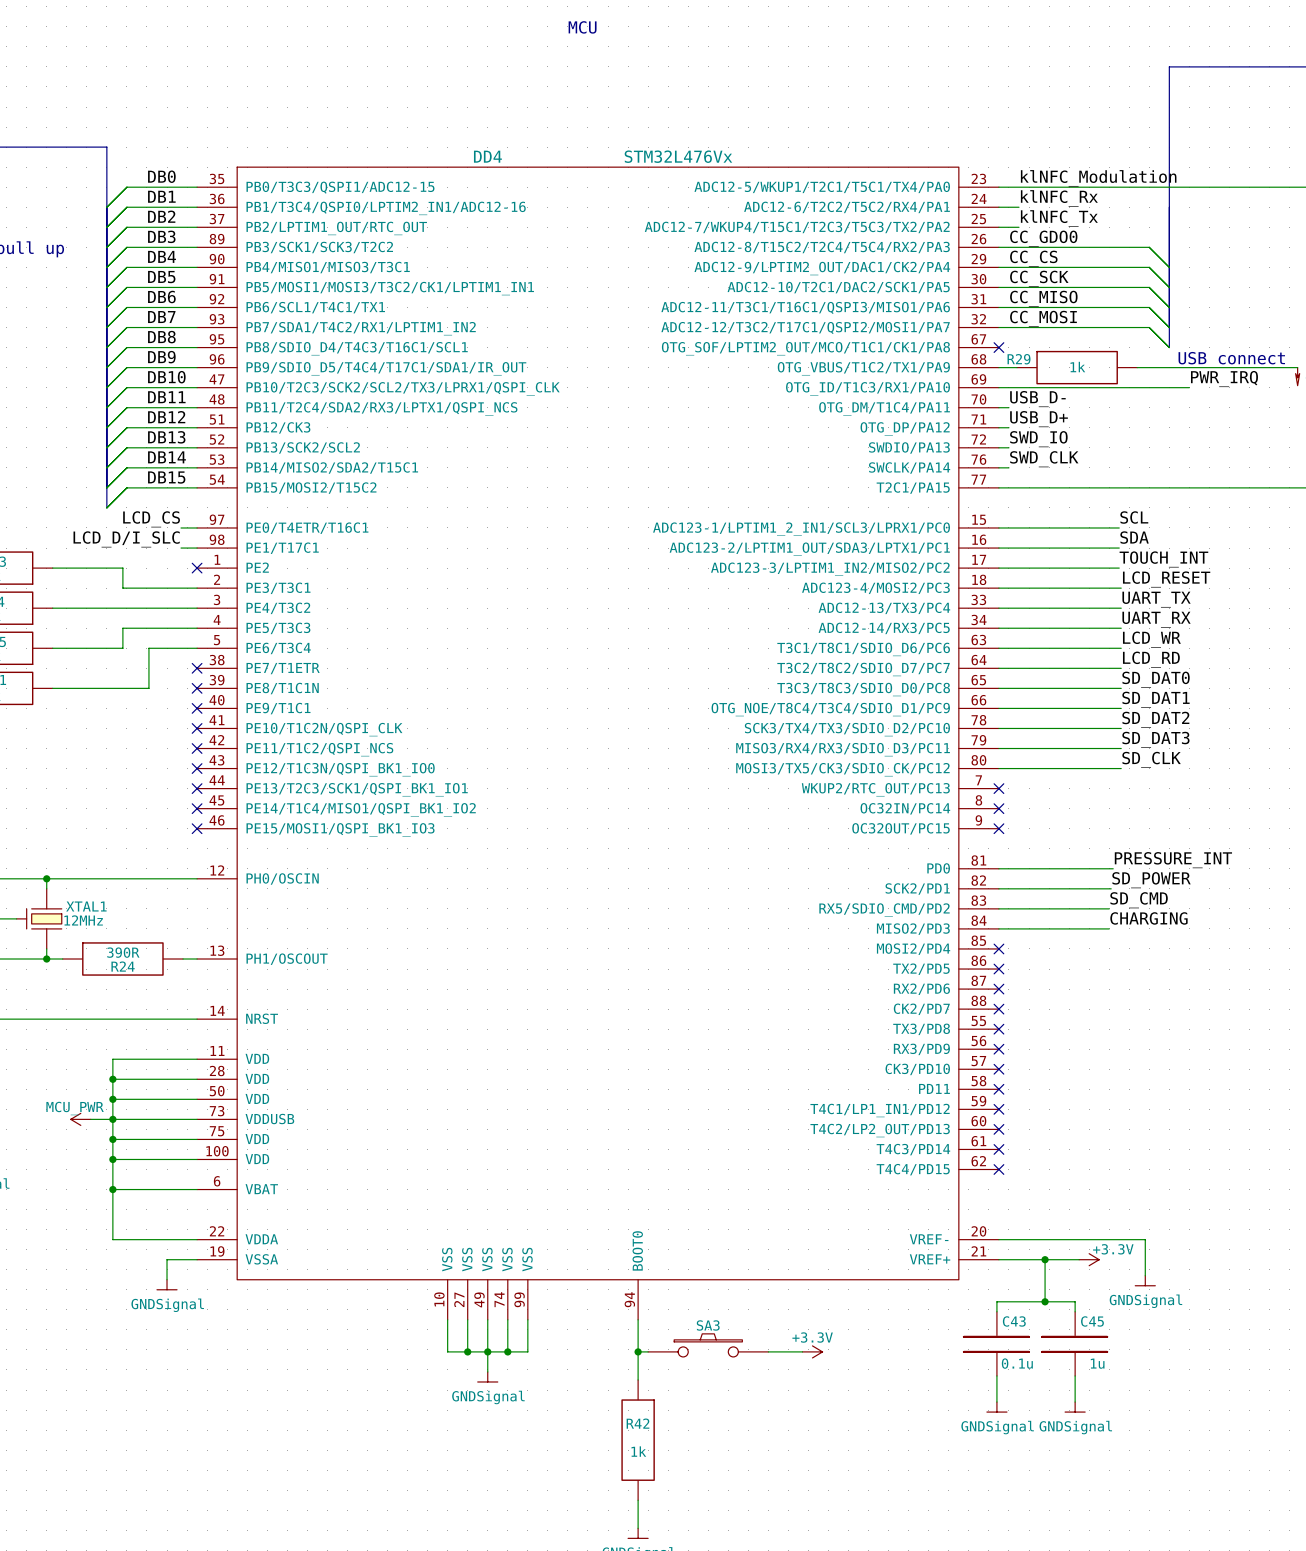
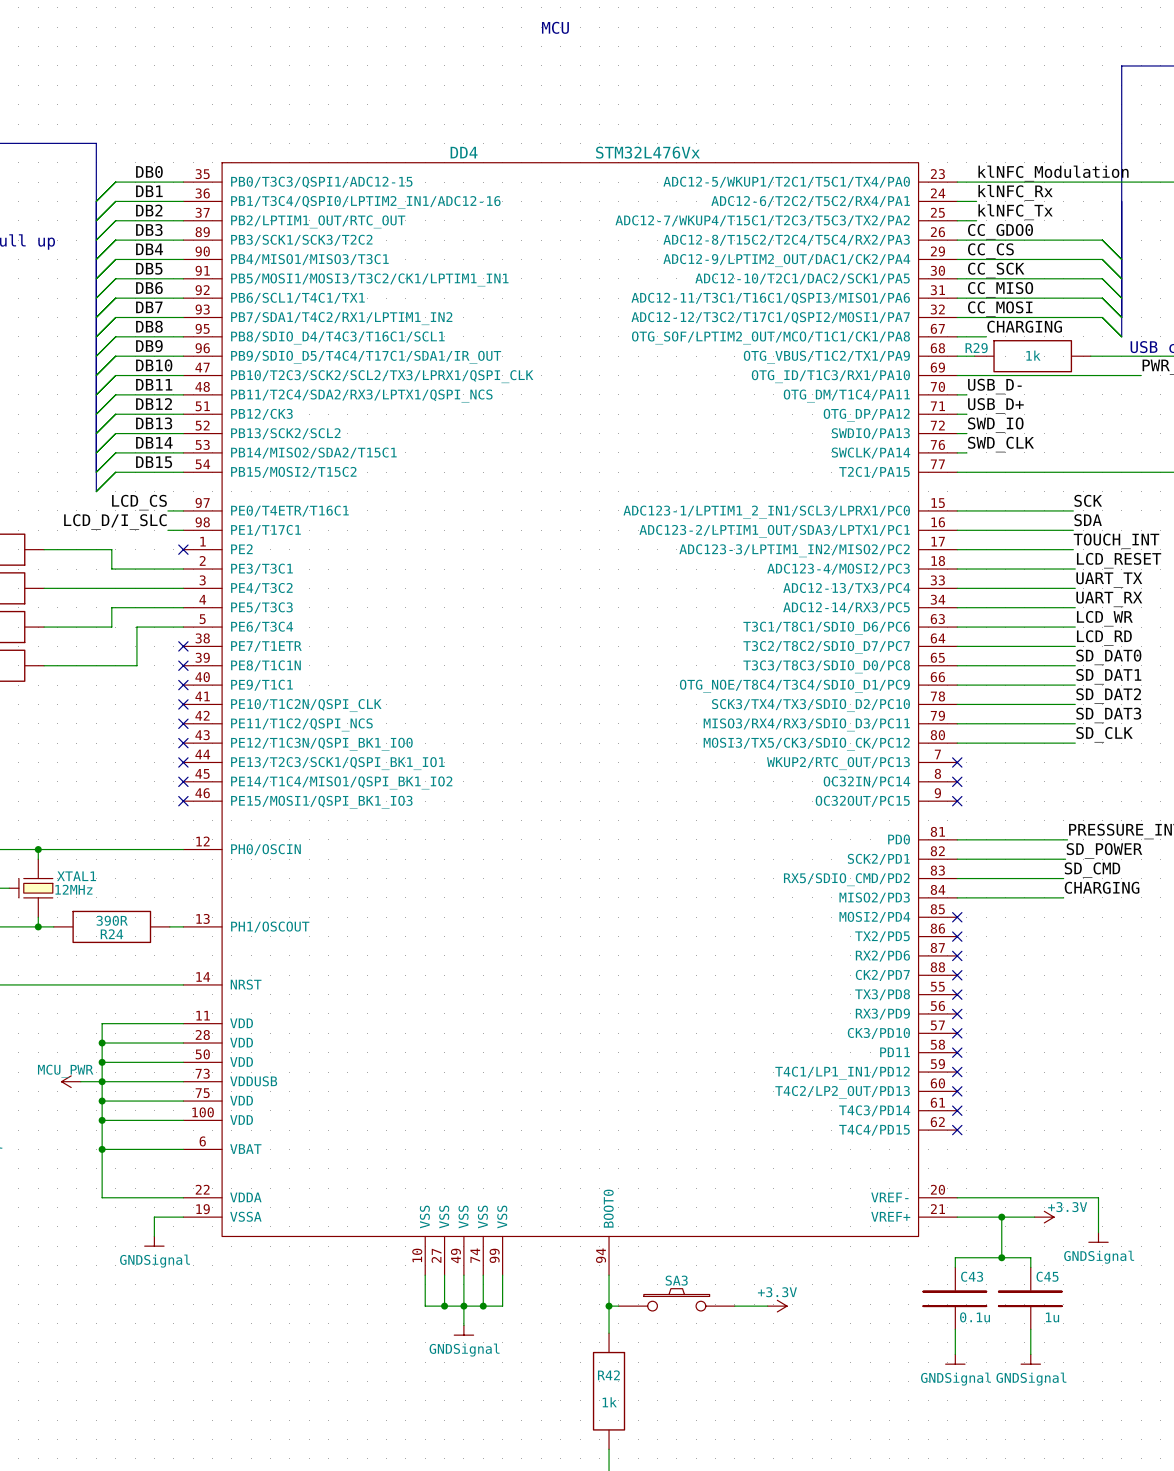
label: none -> CHARGING (1024, 326)
wire: none -> (957, 336) (986, 336)
no-connect mark: (998, 347) -> none
label: SCL (1134, 517) -> SCK (1088, 500)

